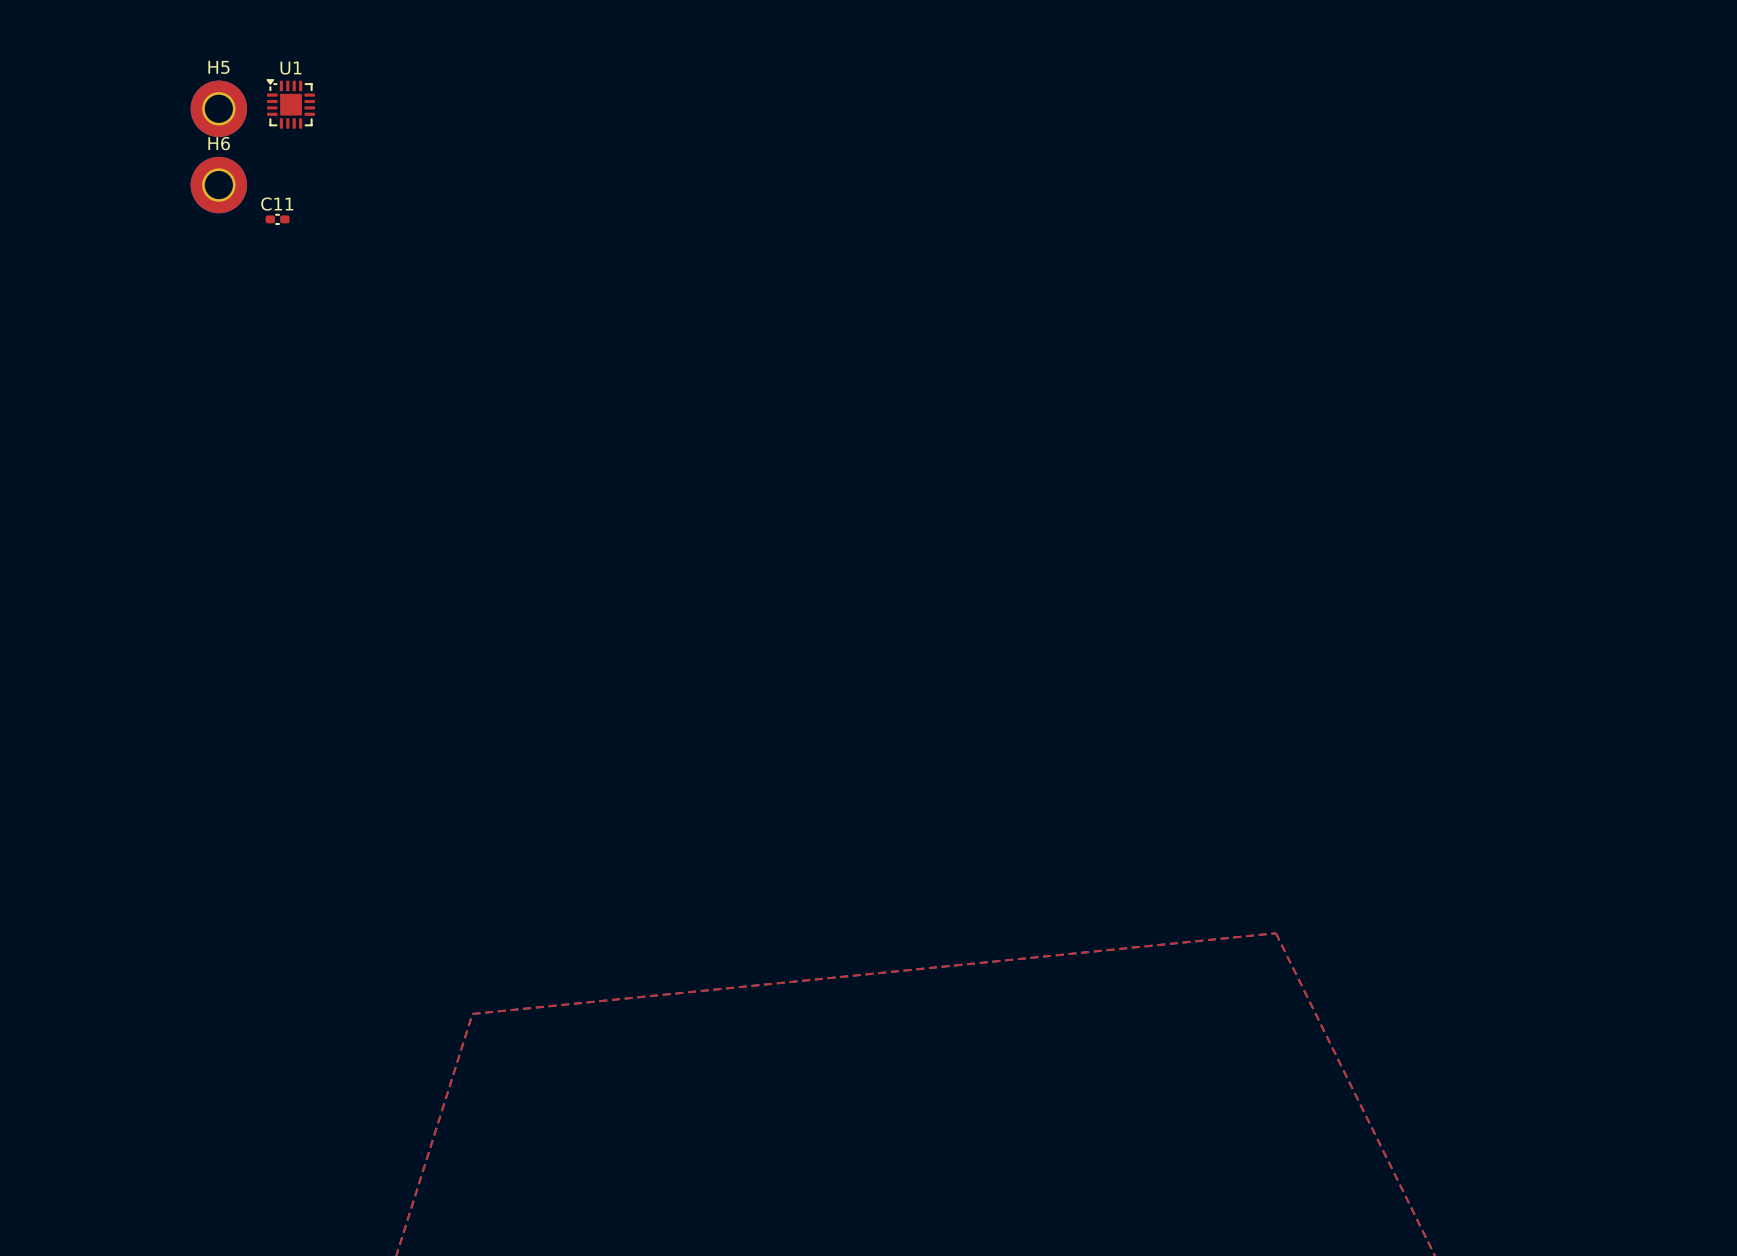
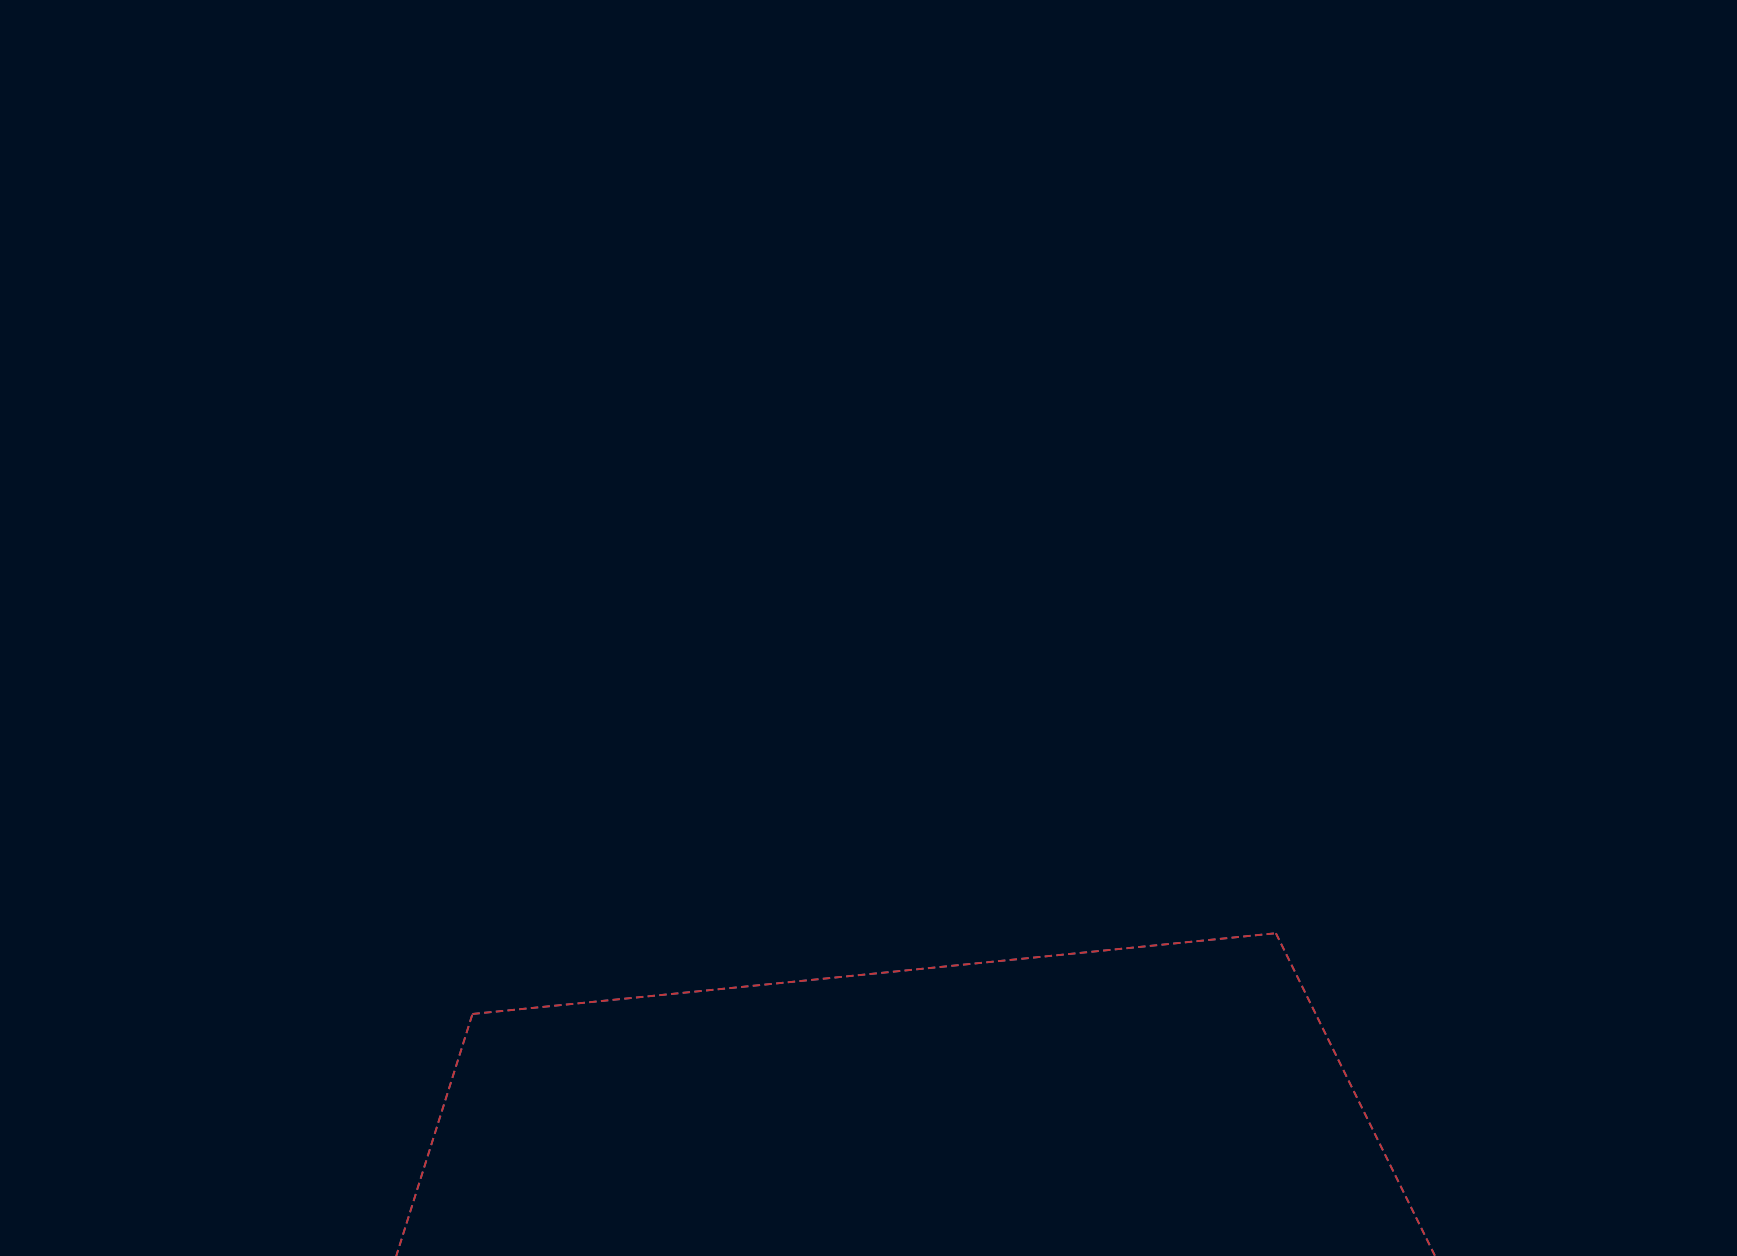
U1: (290, 103) -> none
H5: (218, 108) -> none
H6: (218, 185) -> none
C11: (277, 219) -> none

